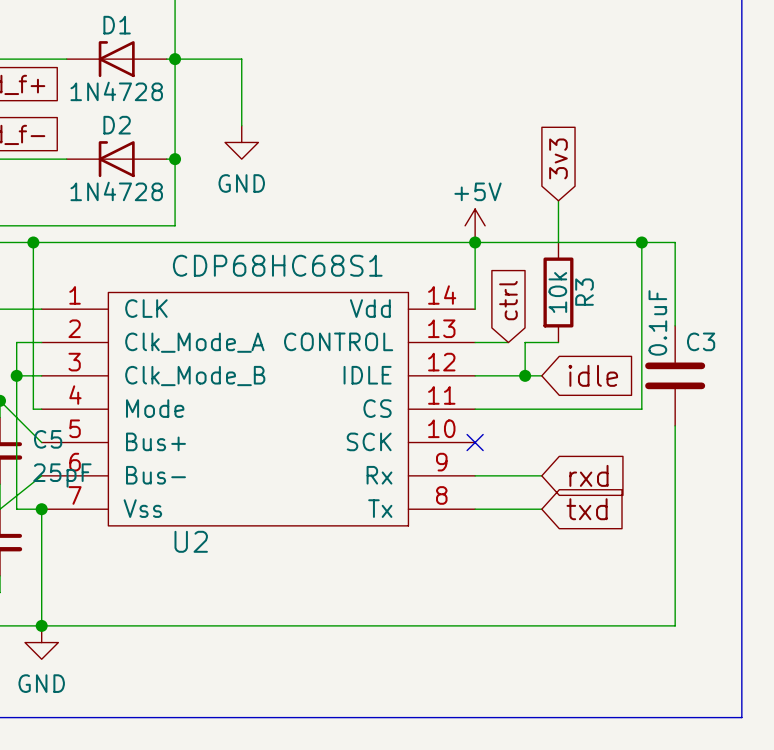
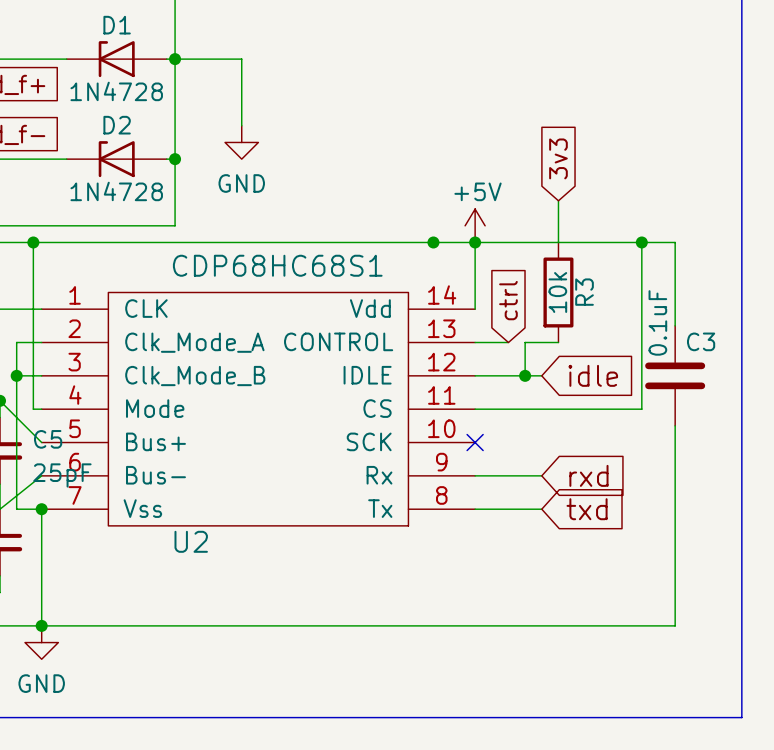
junction: none -> (433, 242)

